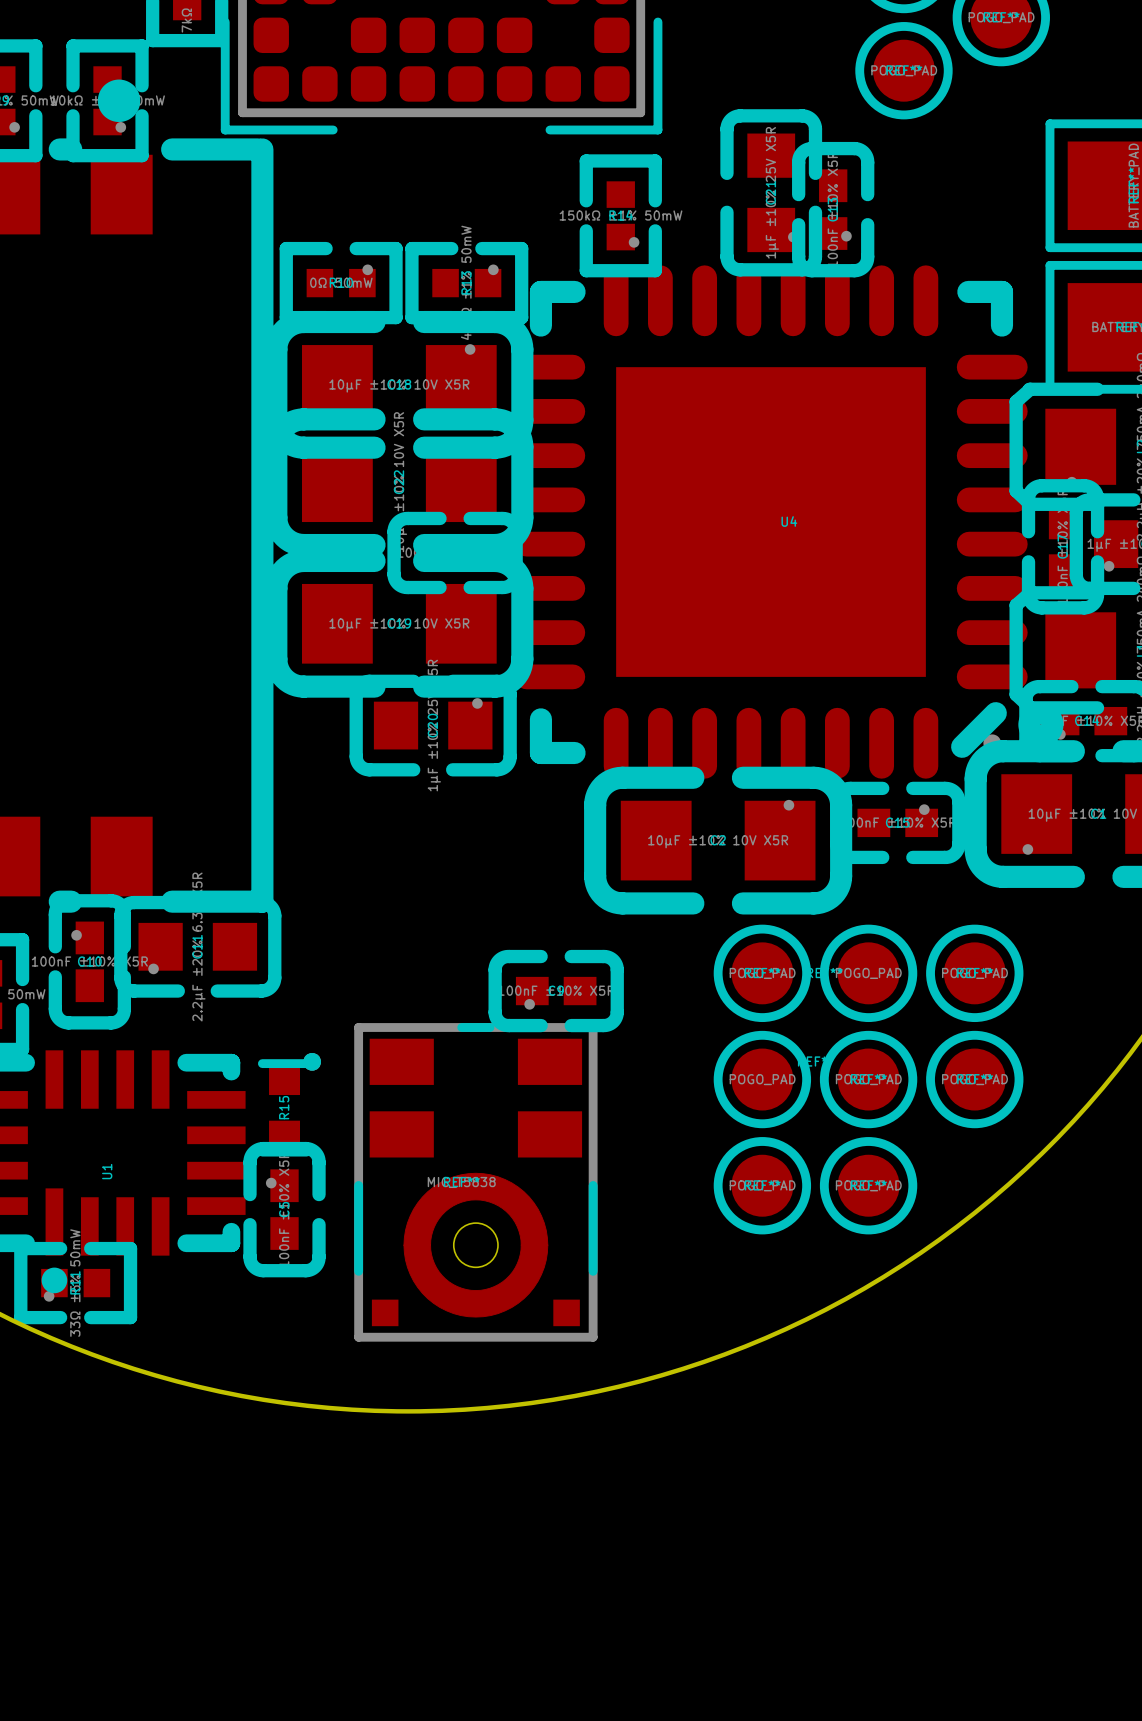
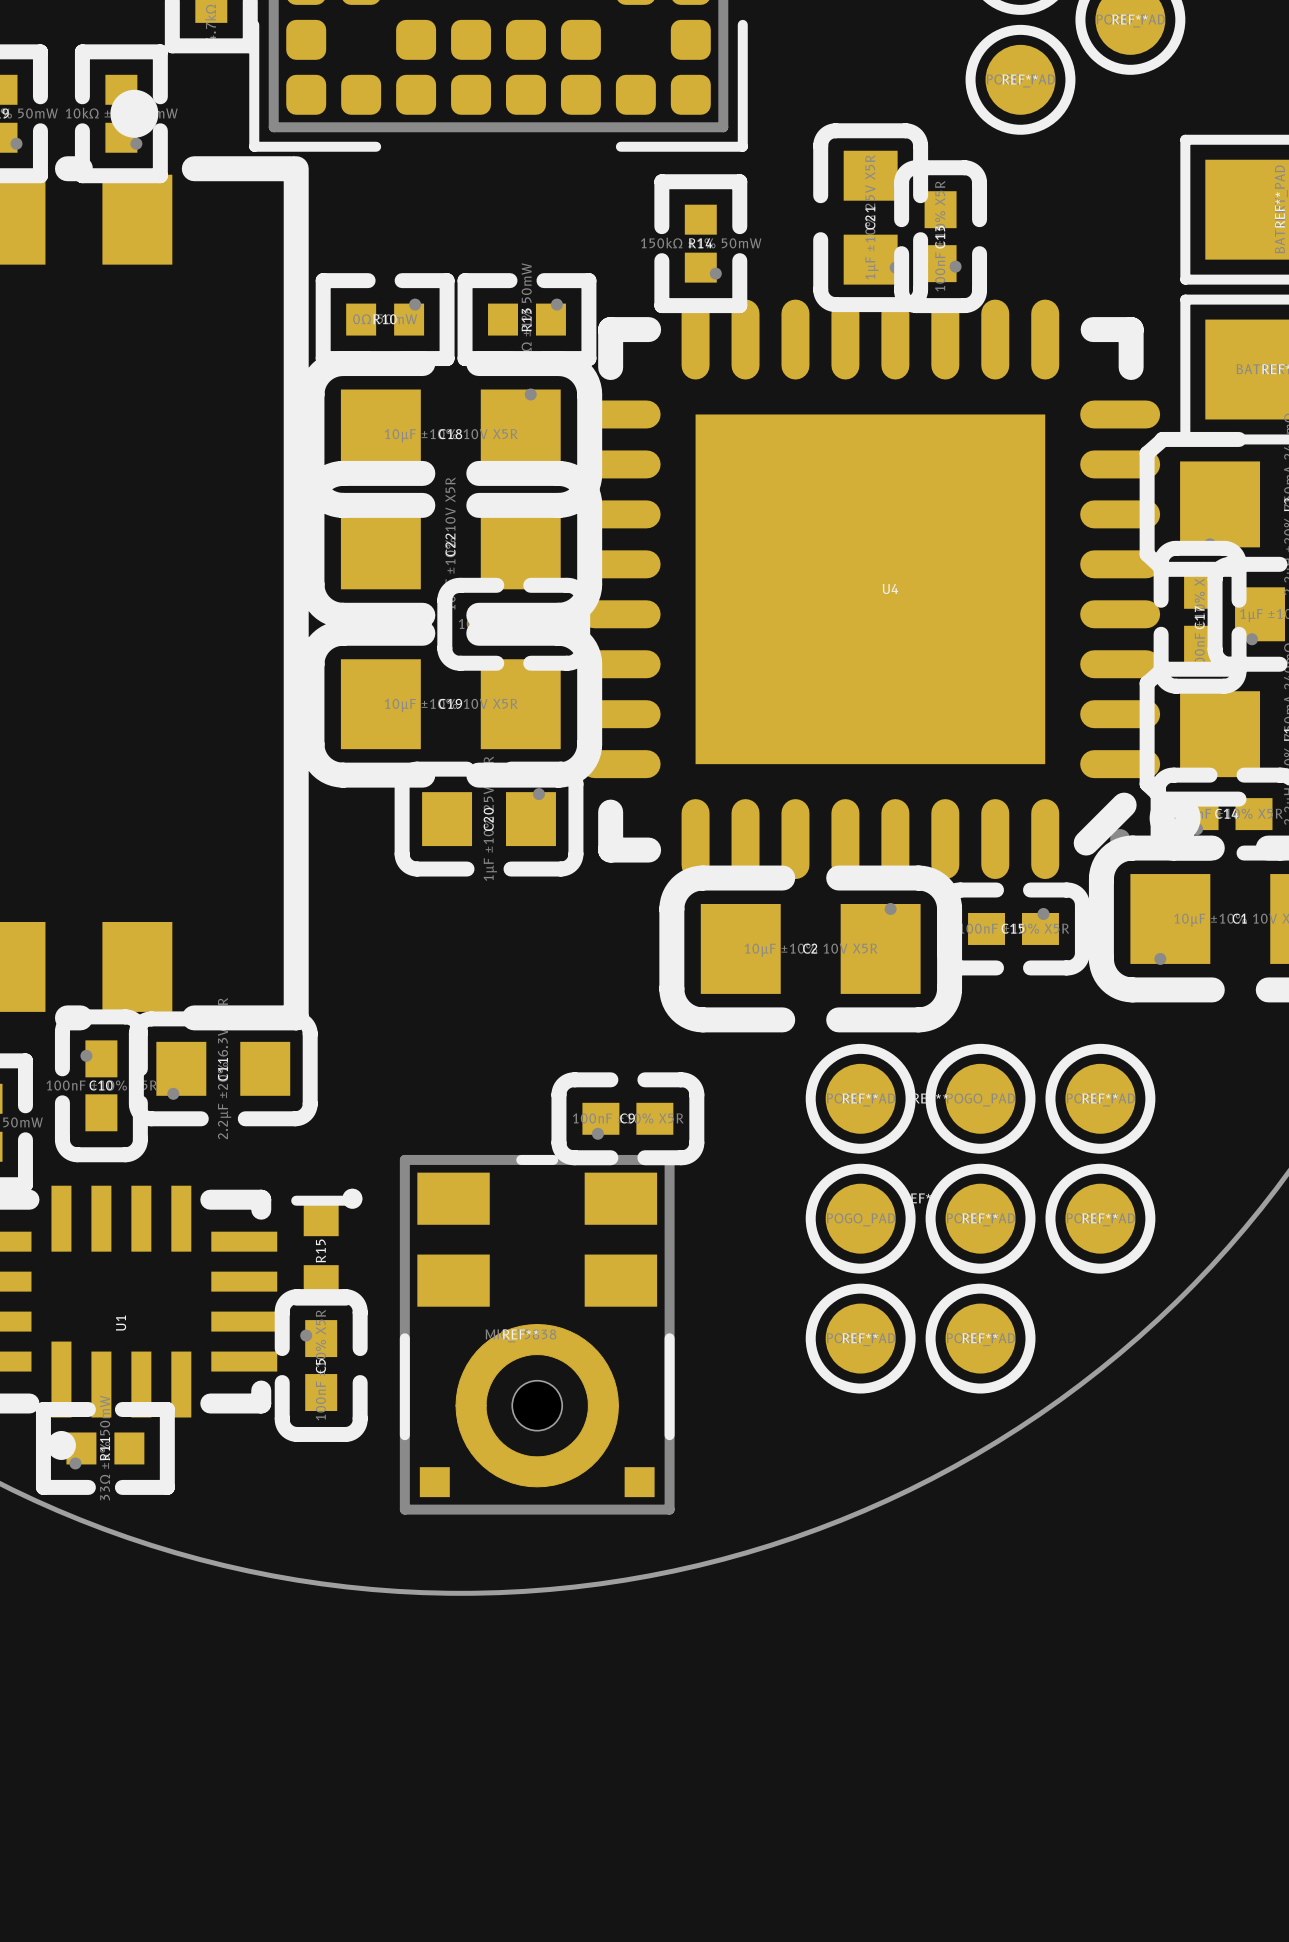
R11 position: (75, 1283) -> (105, 1448)

